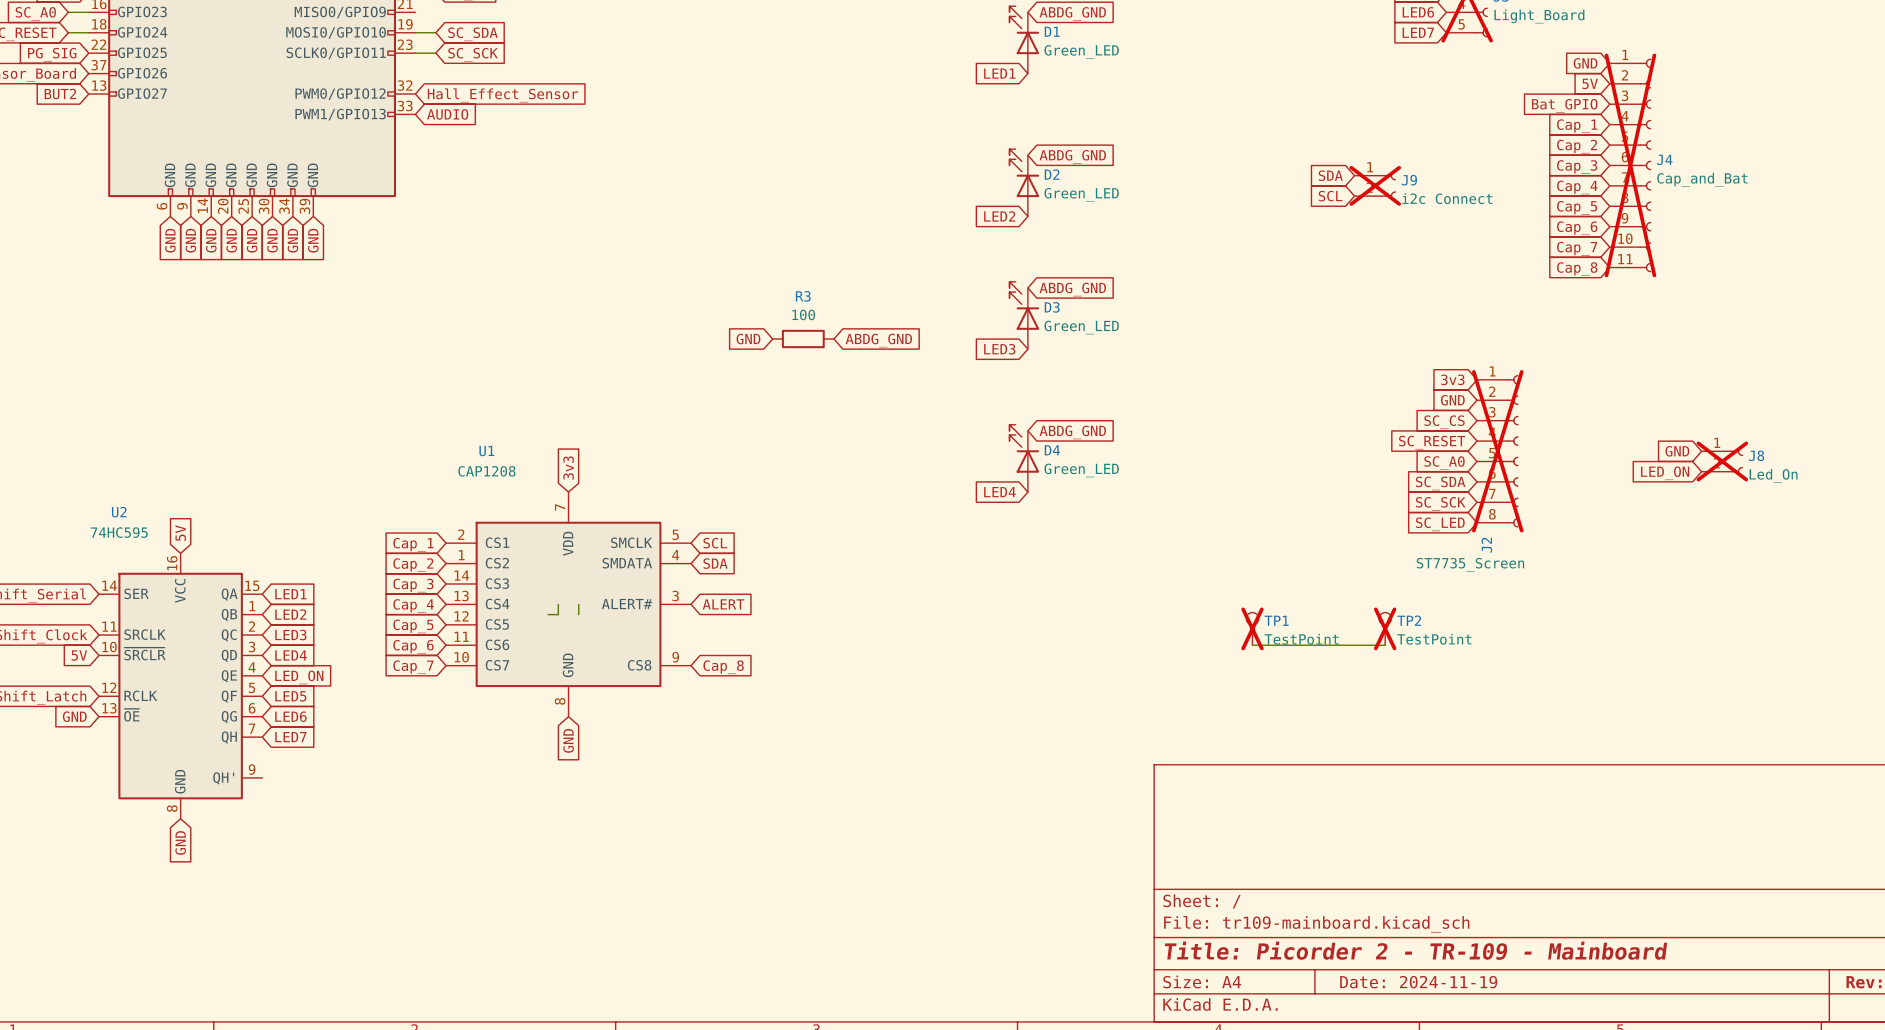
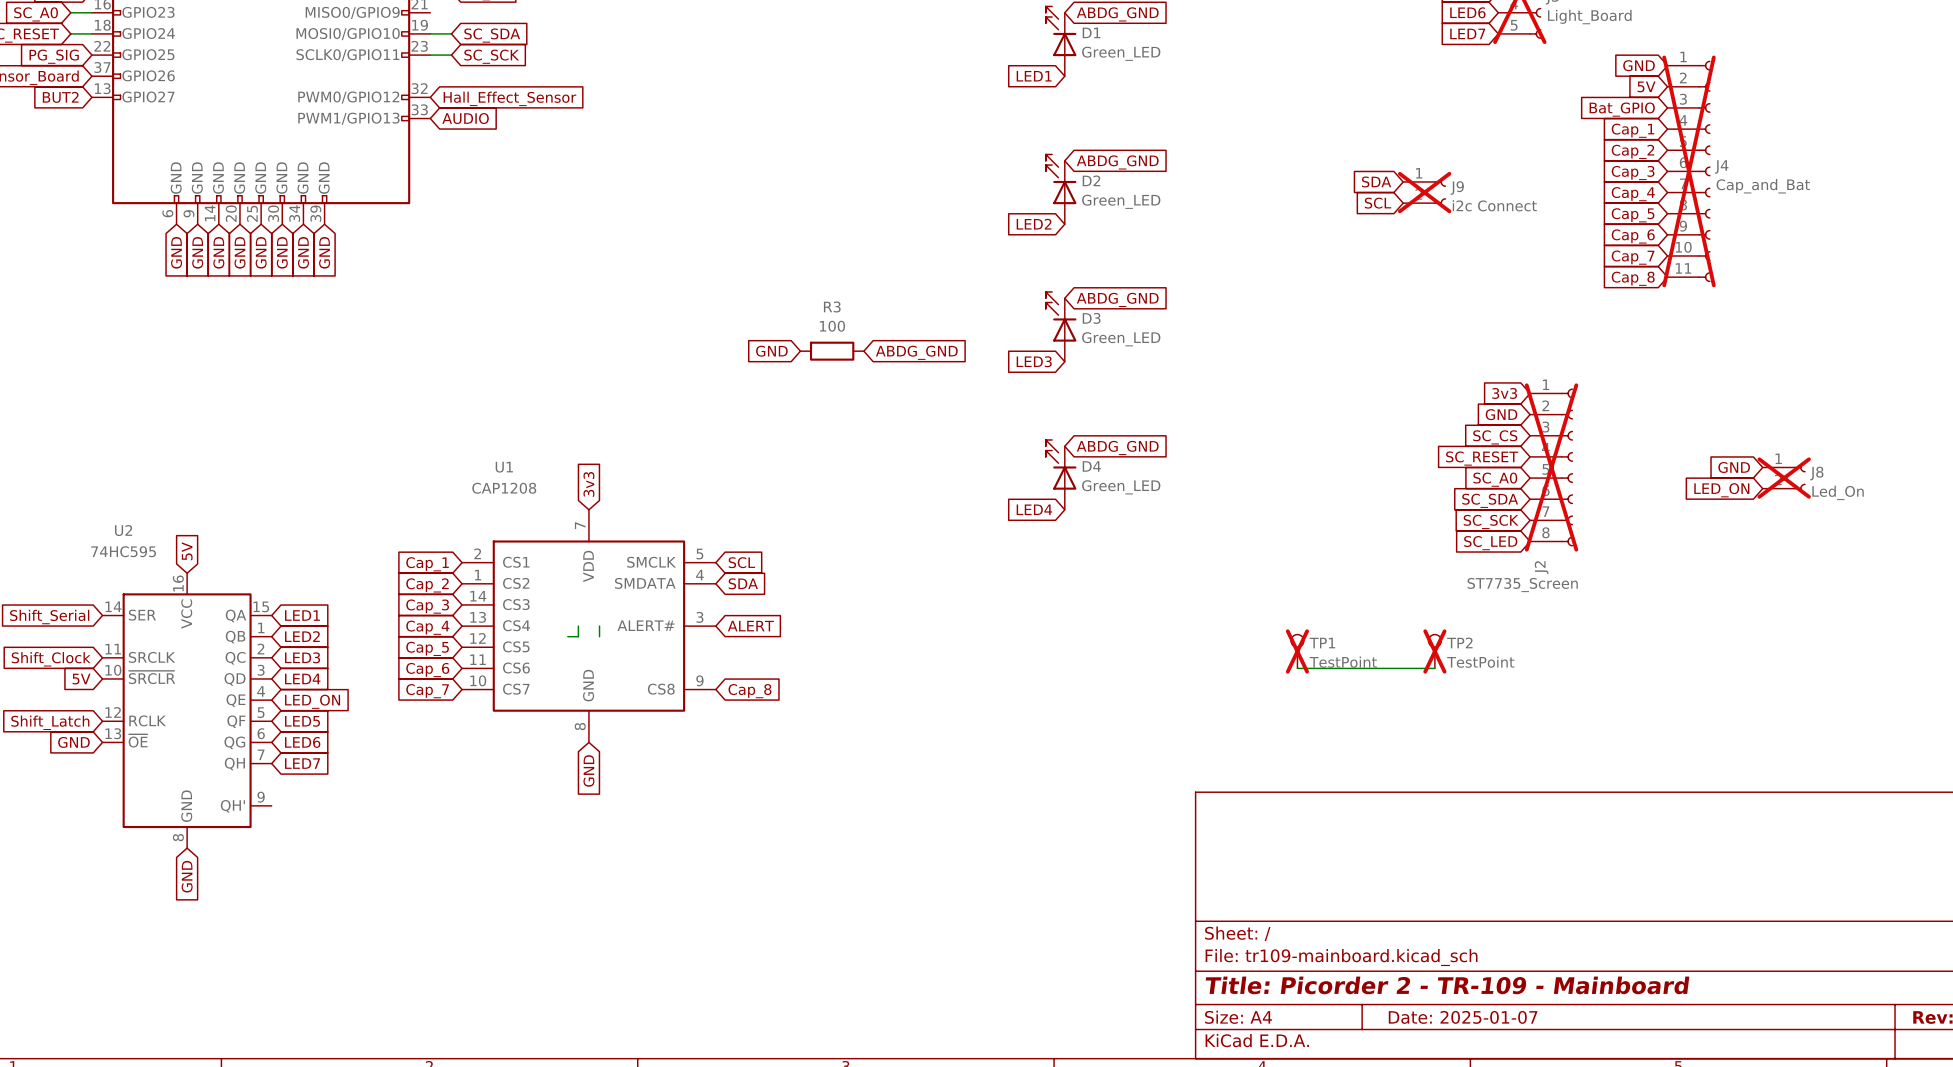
title block: Date: 2024-11-19 (1418, 982) -> Date: 2025-01-07 (1463, 1017)

